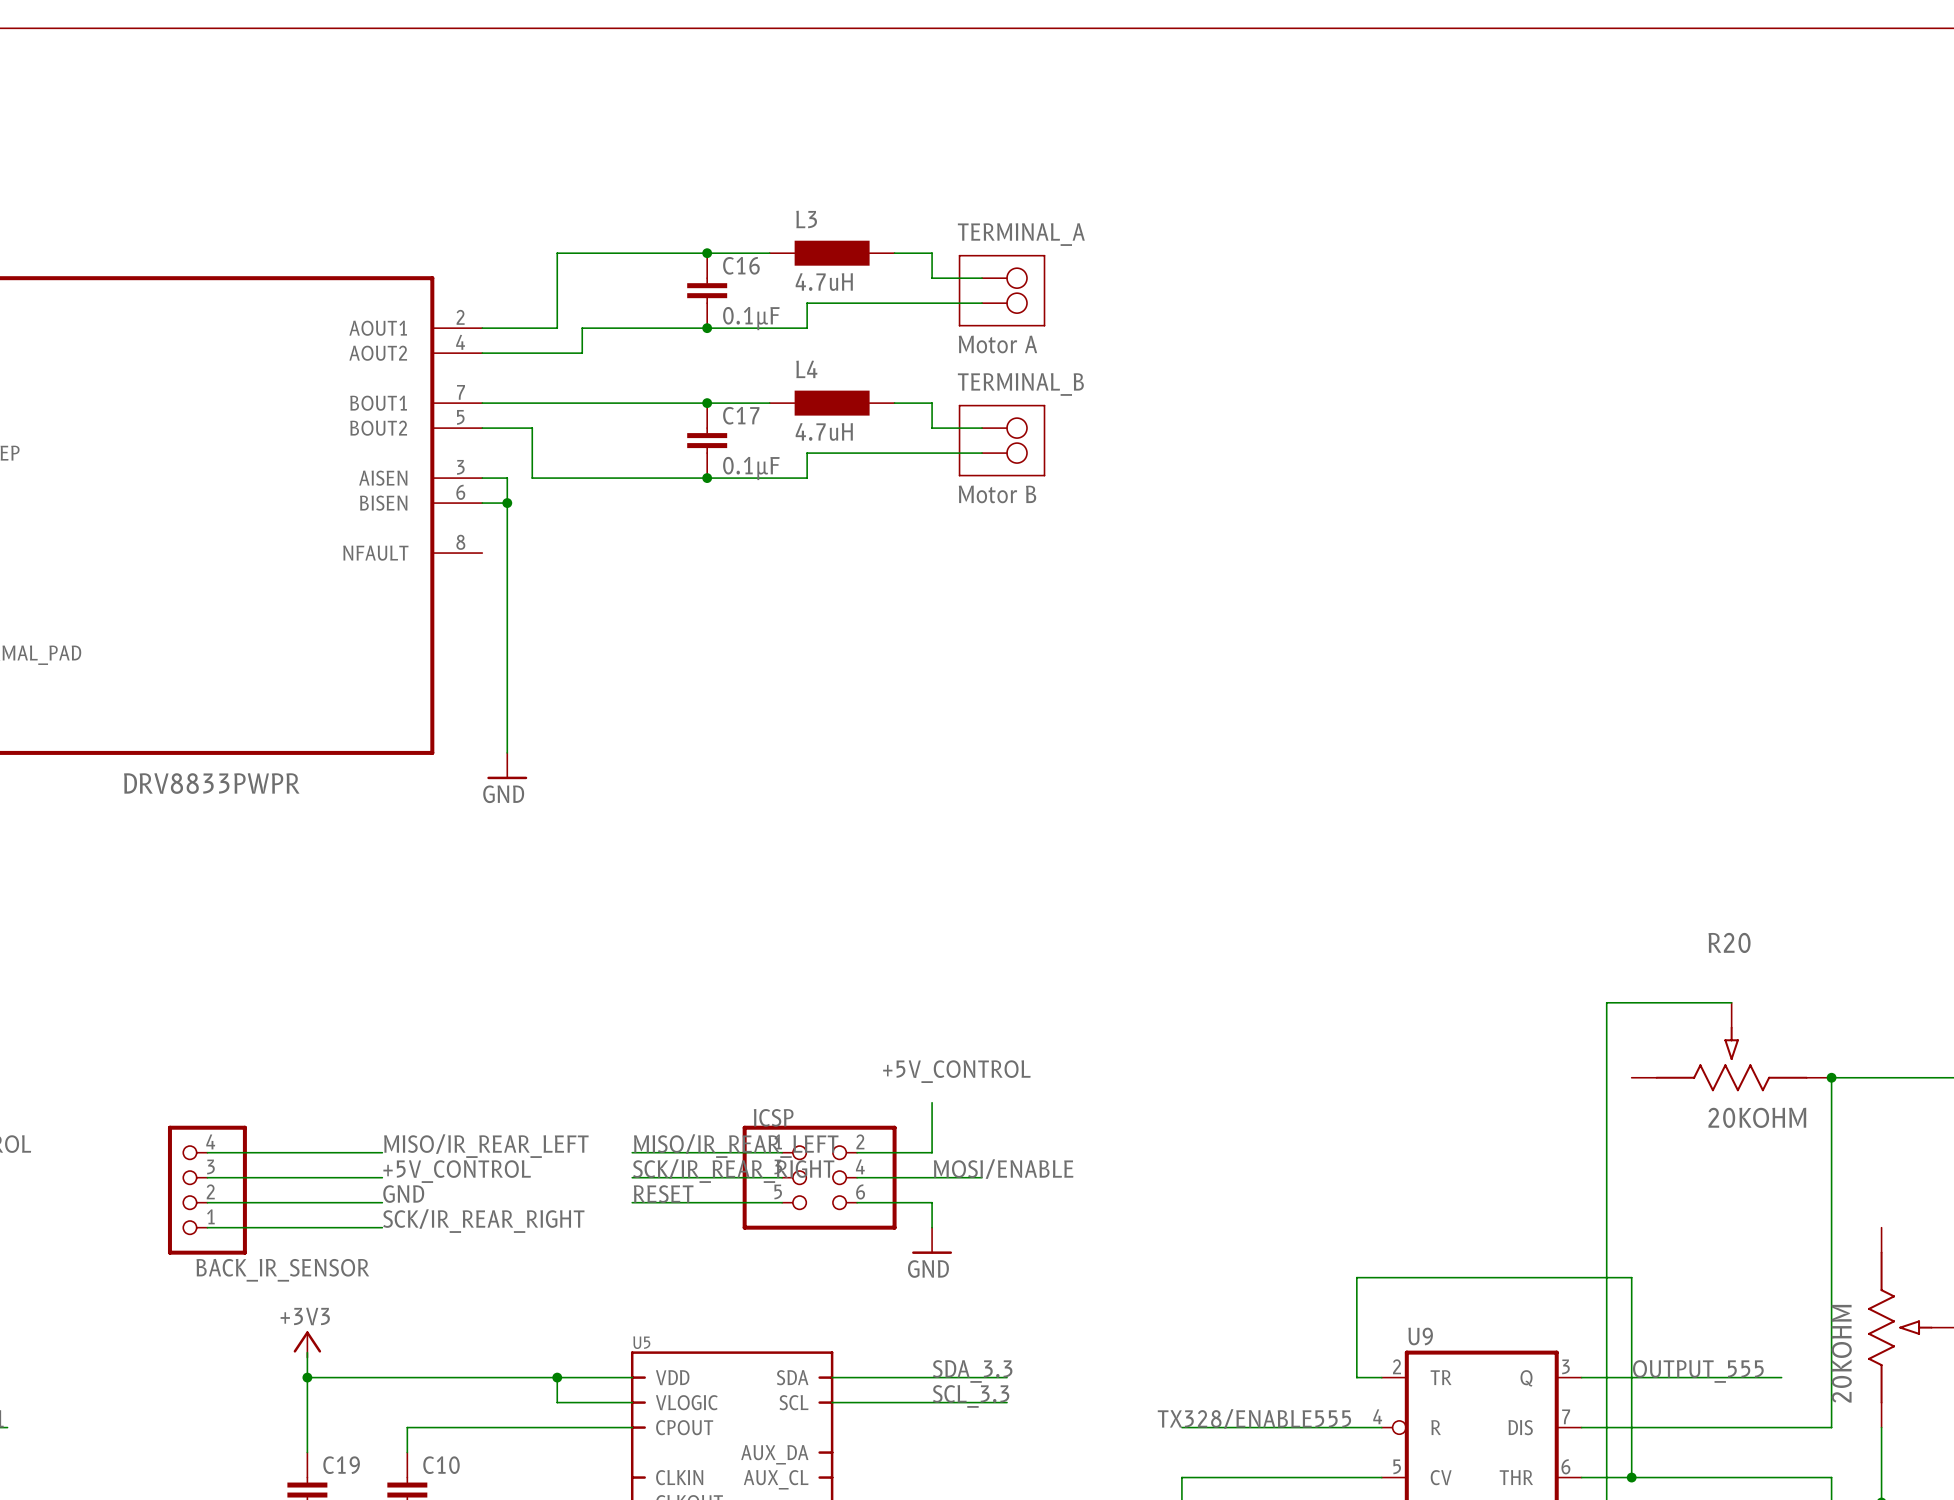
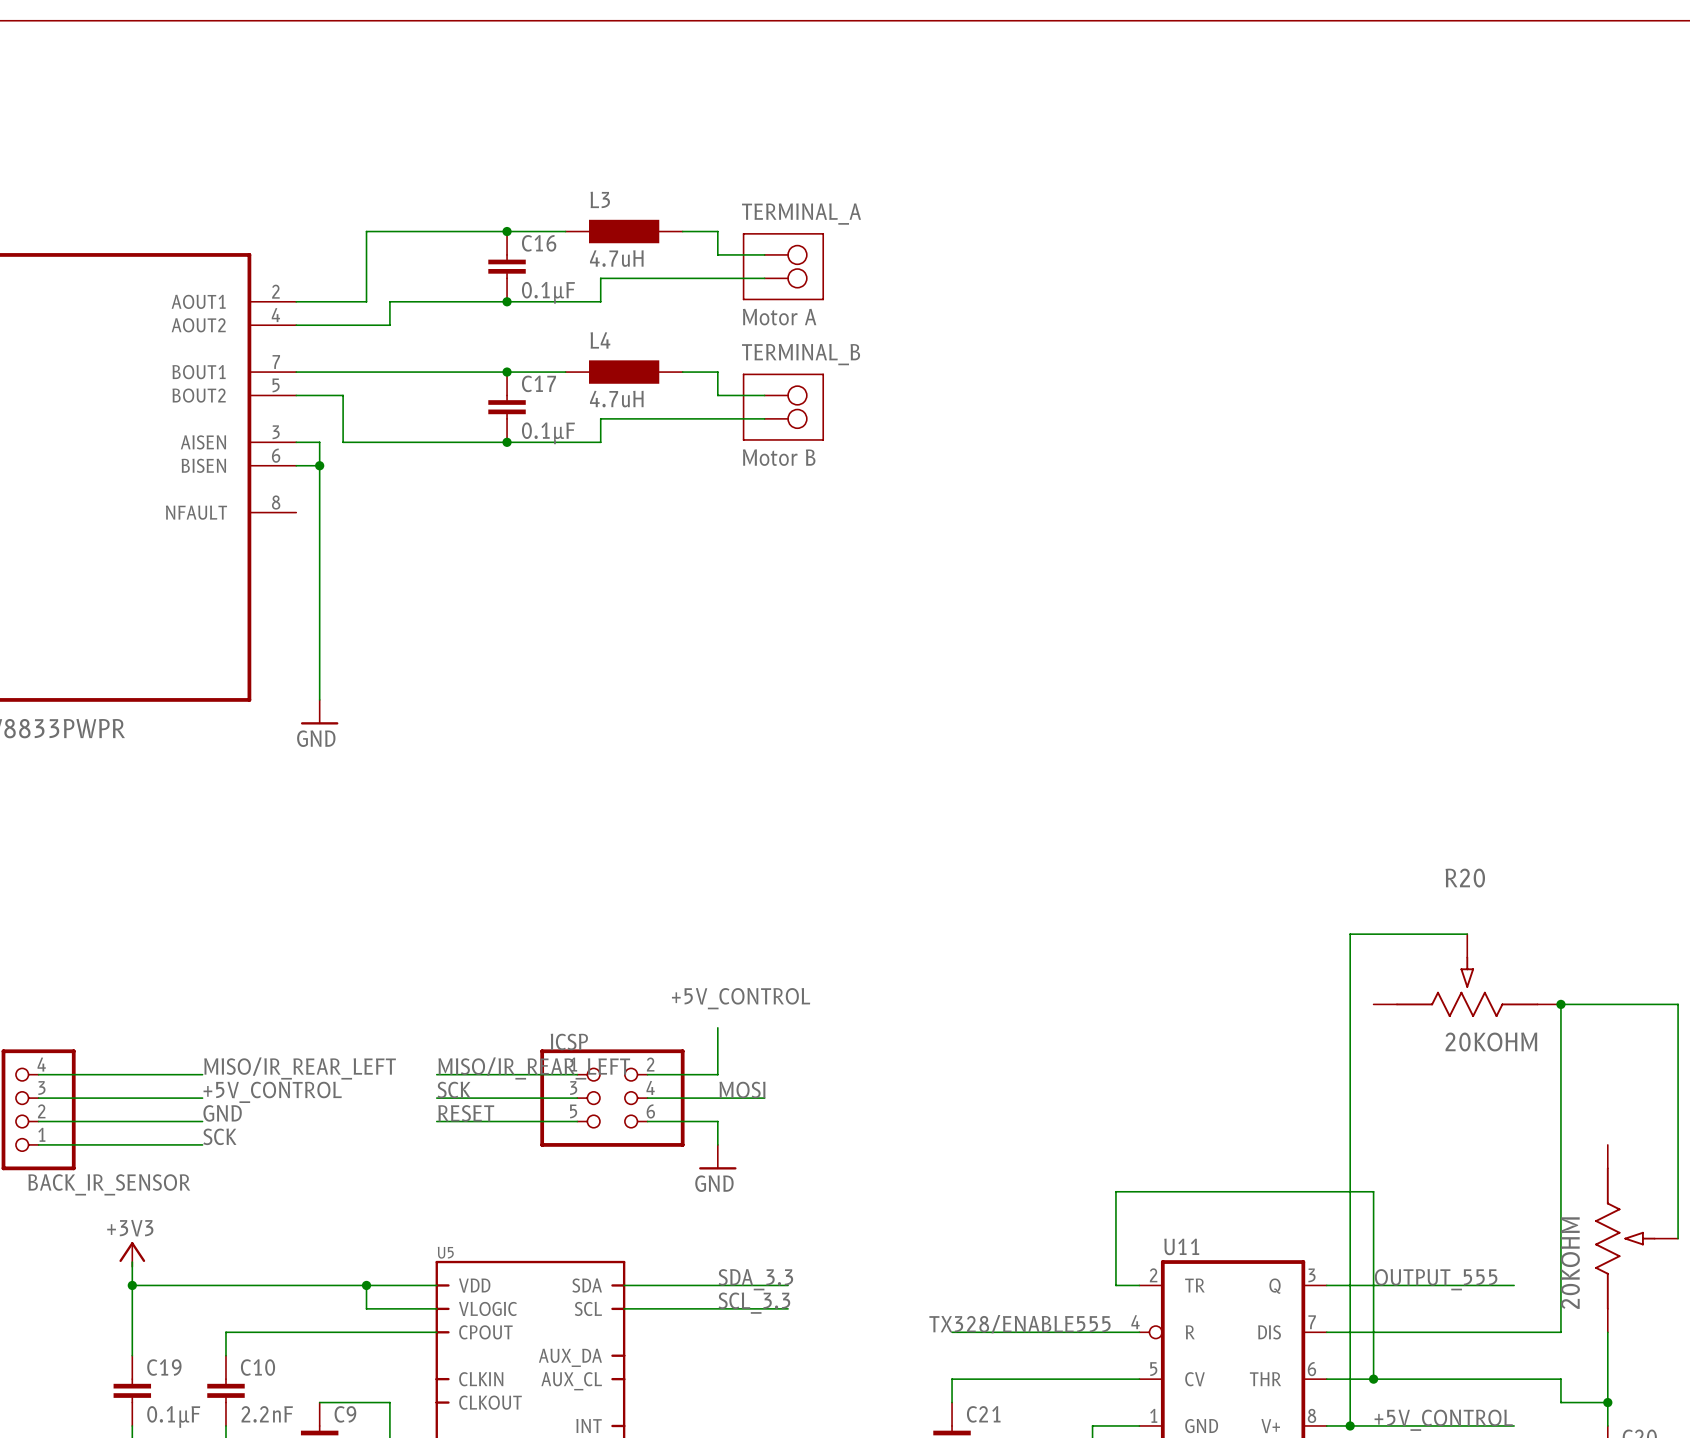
label: MOSI/ENABLE (1003, 1169) -> MOSI (742, 1089)
label: SCK/IR_REAR_RIGHT (733, 1171) -> SCK (454, 1089)
label: SCK/IR_REAR_RIGHT (483, 1221) -> SCK (219, 1136)
U9 name: U9 (1420, 1336) -> U11 (1181, 1246)

